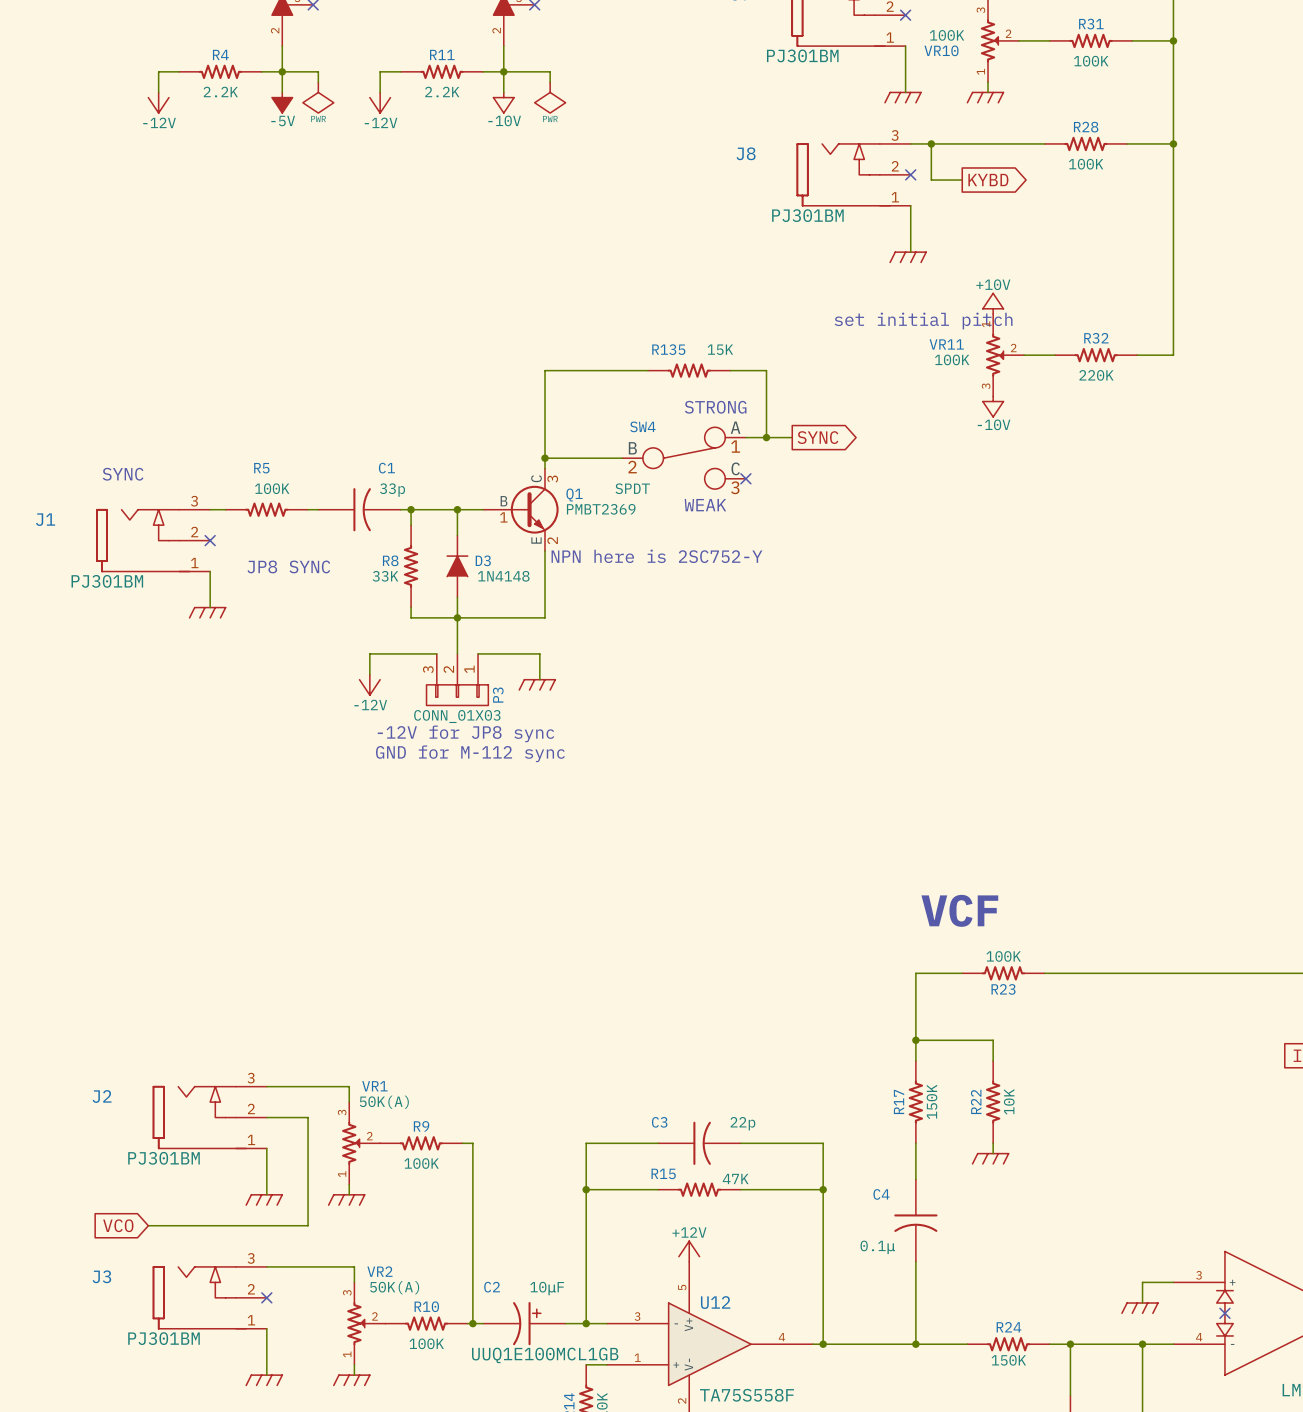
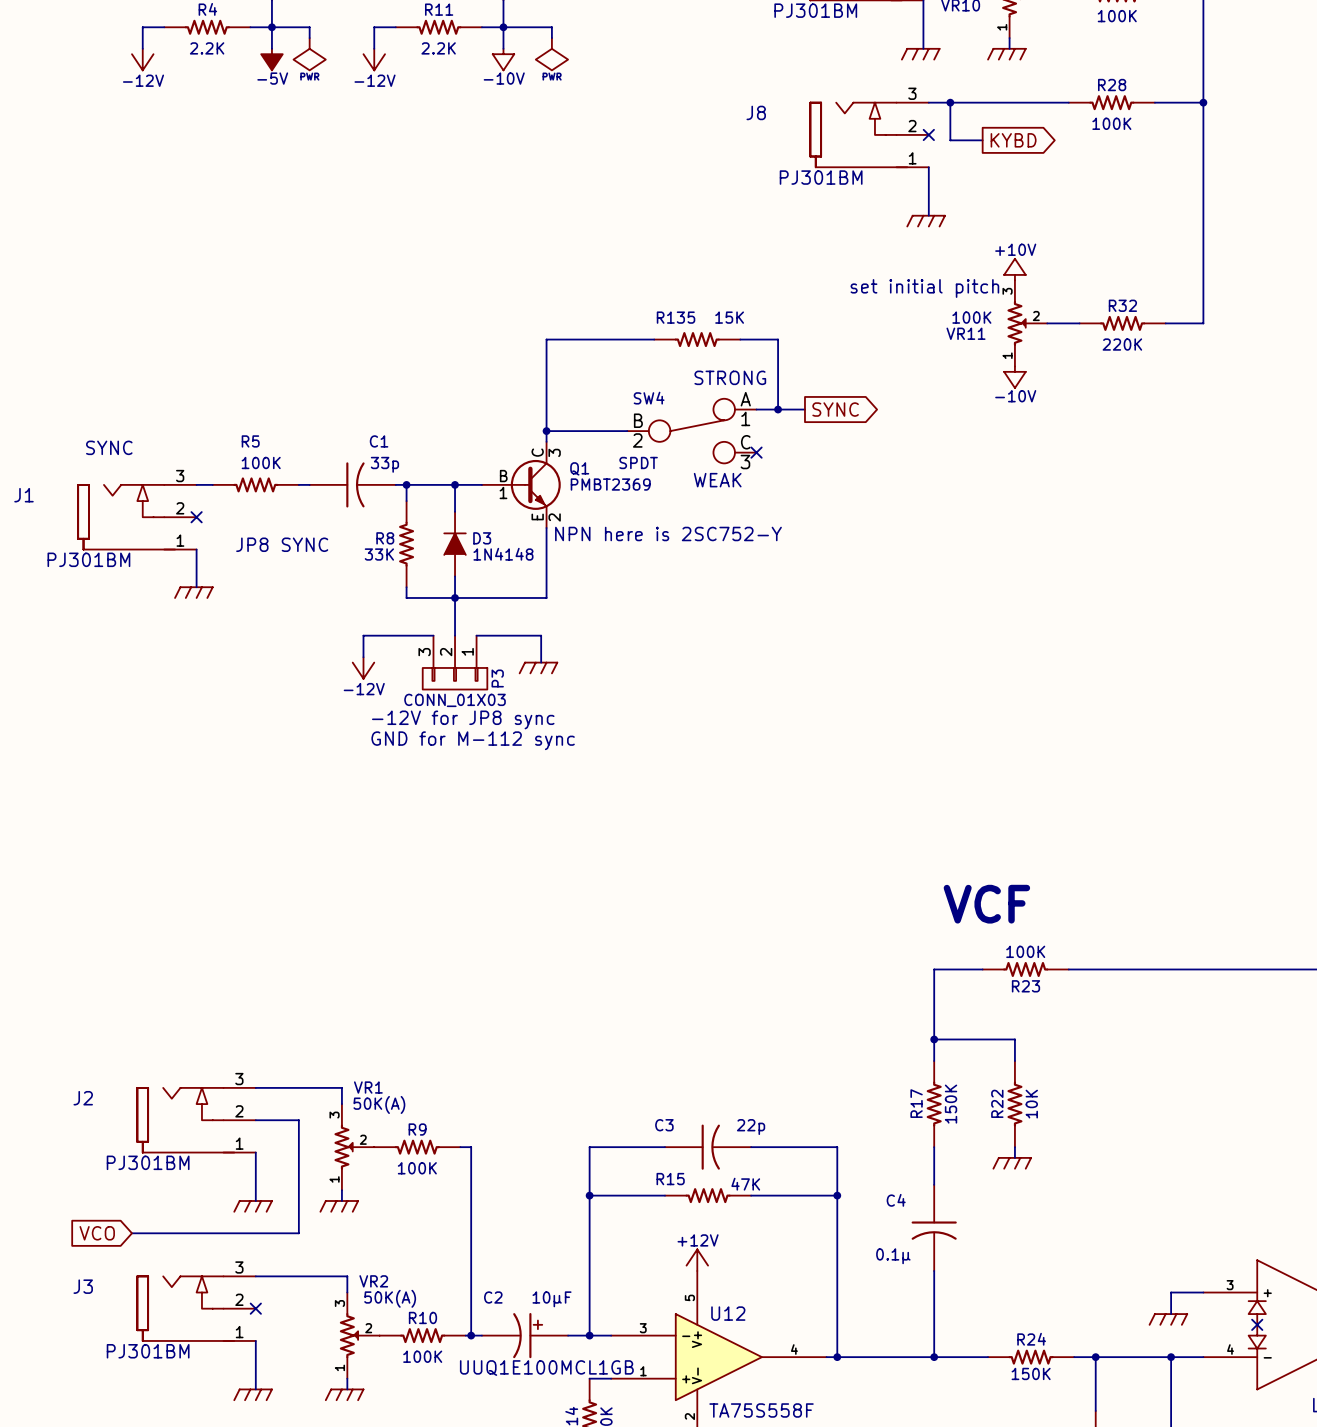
VR11 flip: as is (994, 355) -> up-down (1016, 323)

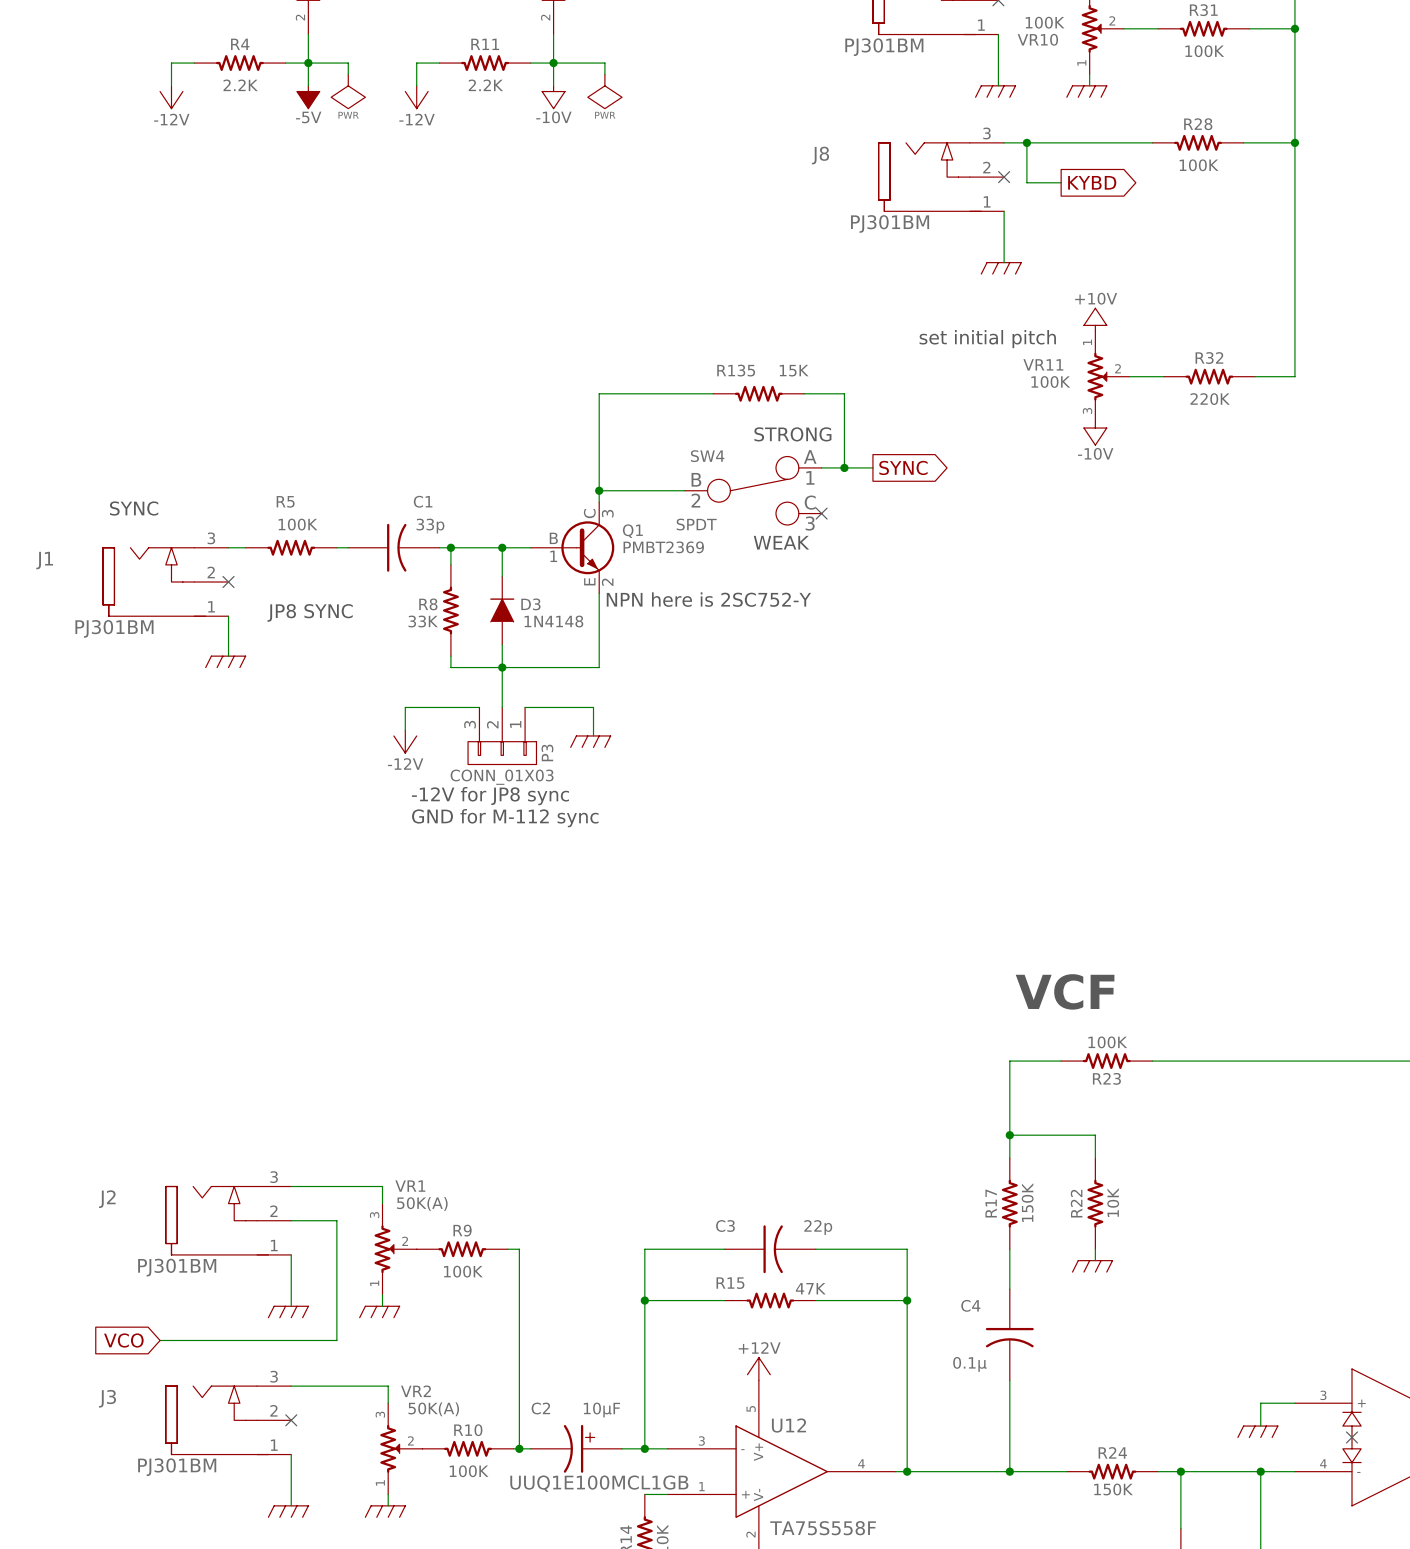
VR11 flip: as is (1016, 323) -> up-down (1097, 376)

